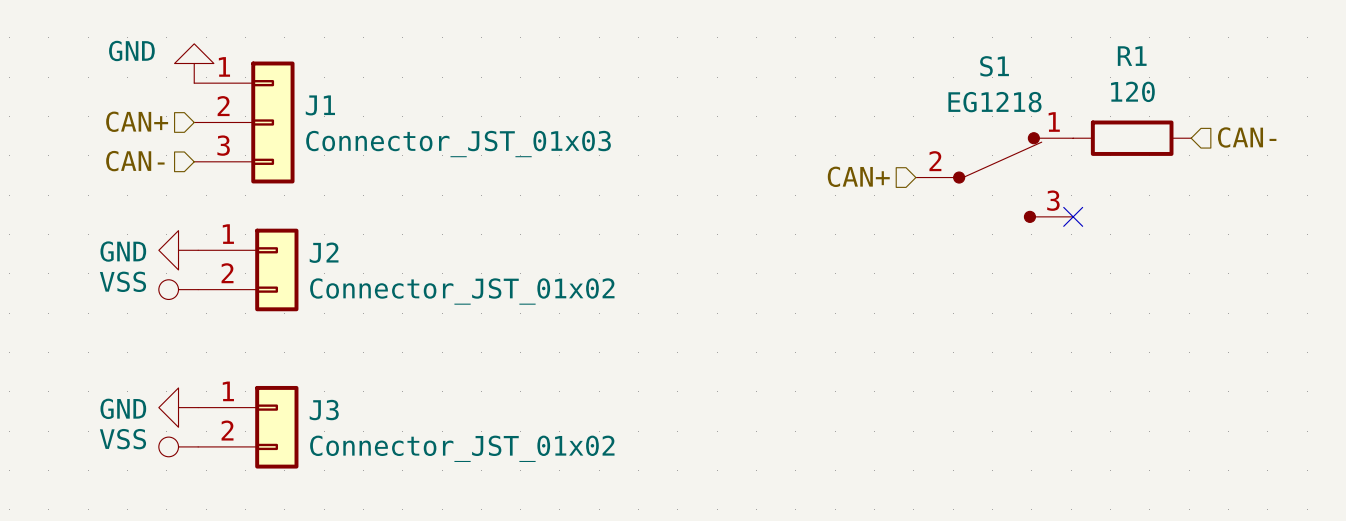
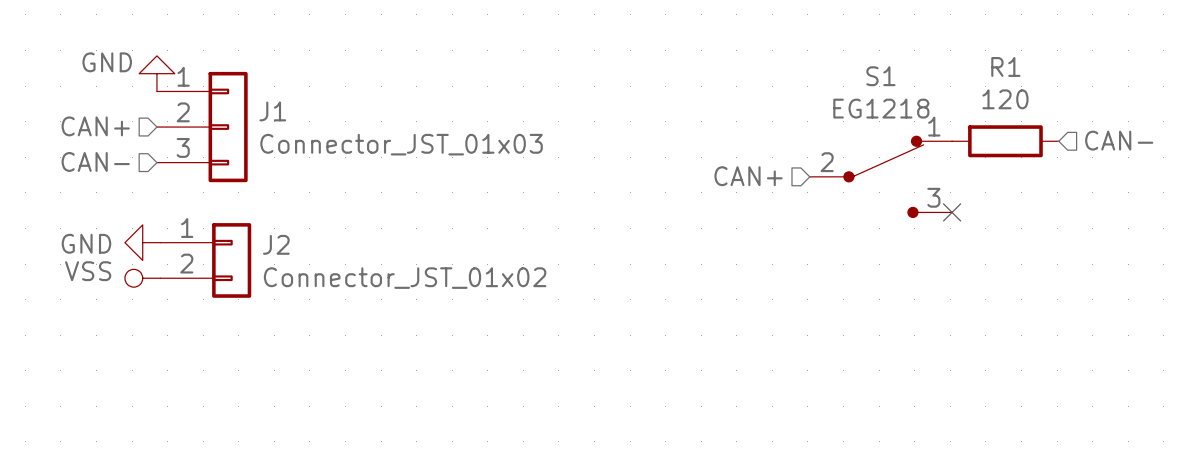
power symbol: GND (178, 407) -> none
J3: Connector_JST_01x02 (248, 427) -> none
power symbol: VSS (178, 446) -> none

